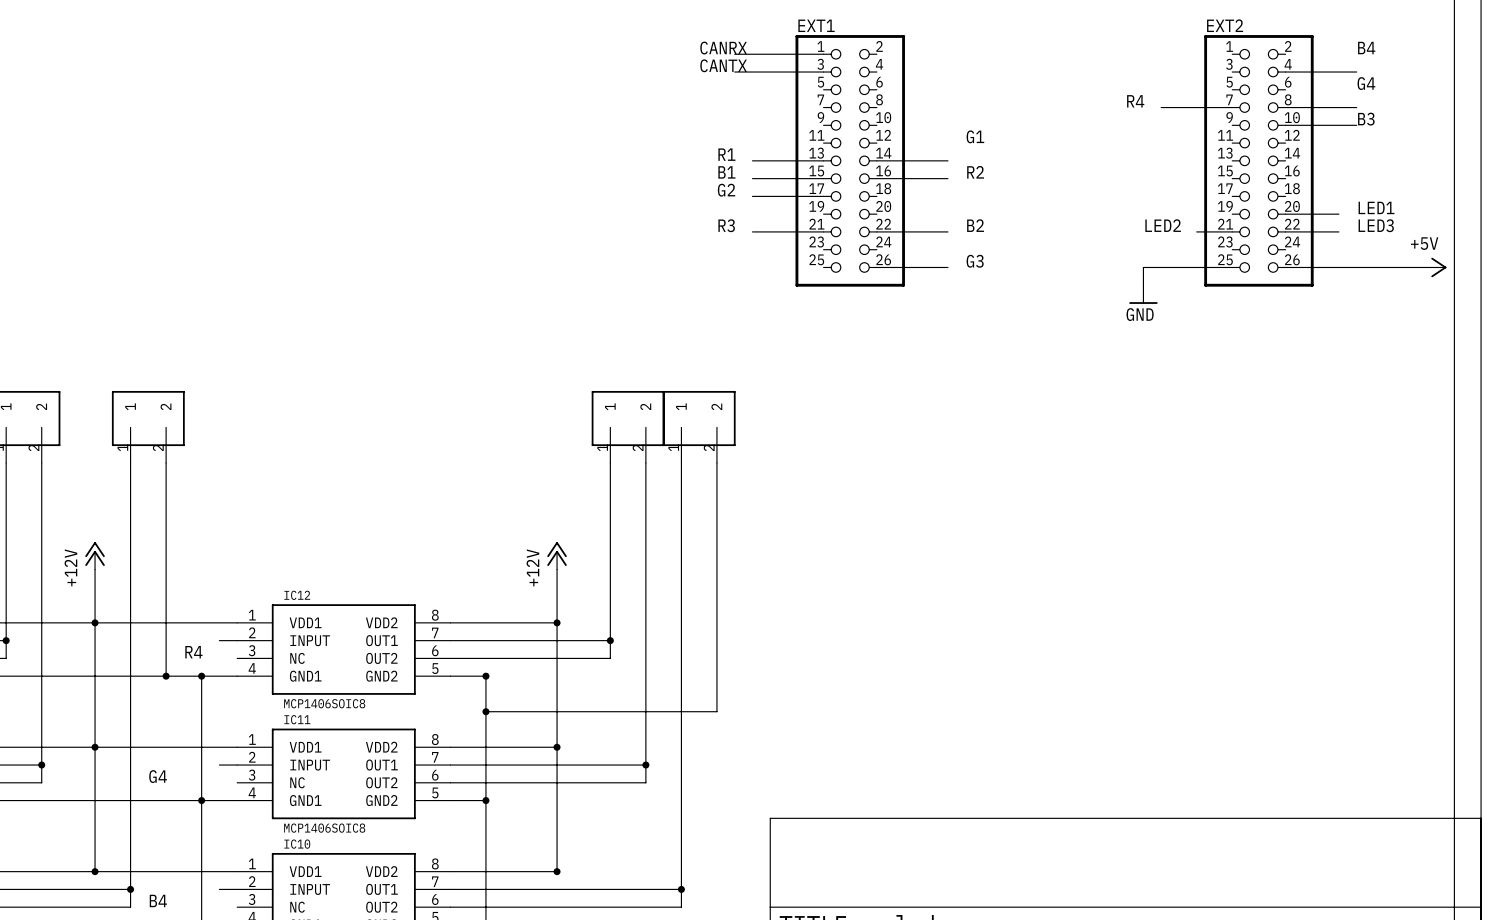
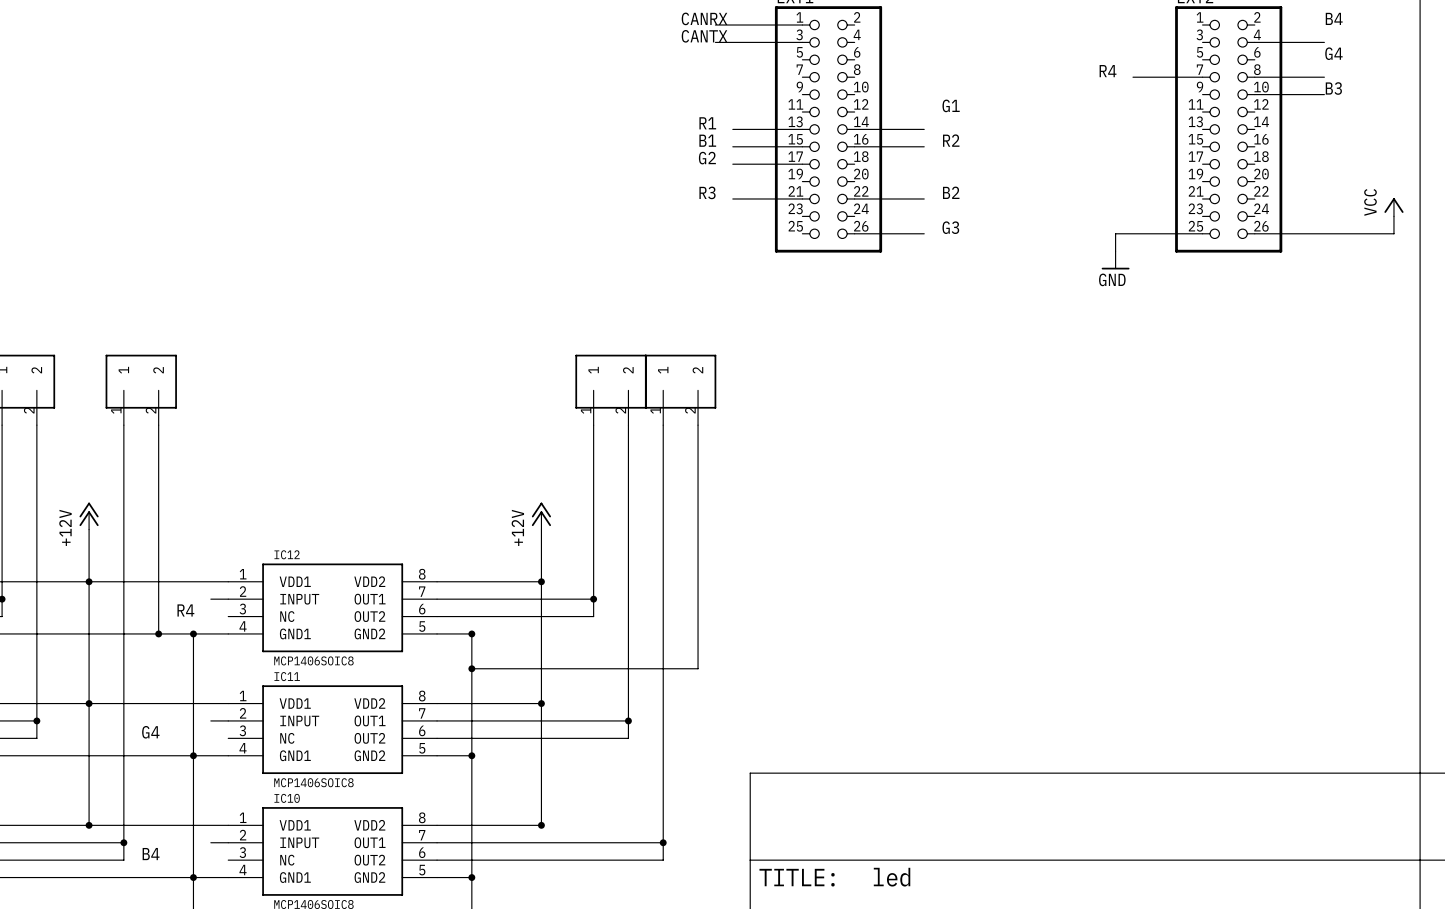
label: LED1 (1376, 207) -> none
wire: (1285, 214) (1338, 214) -> none
label: LED2 (1163, 225) -> none
label: LED3 (1376, 225) -> none
wire: (1196, 231) (1232, 231) -> none
wire: (1285, 231) (1338, 231) -> none
power symbol: none -> VCC (1393, 207)
wire: none -> (1393, 216) (1393, 233)
power symbol: +5V (1437, 267) -> none

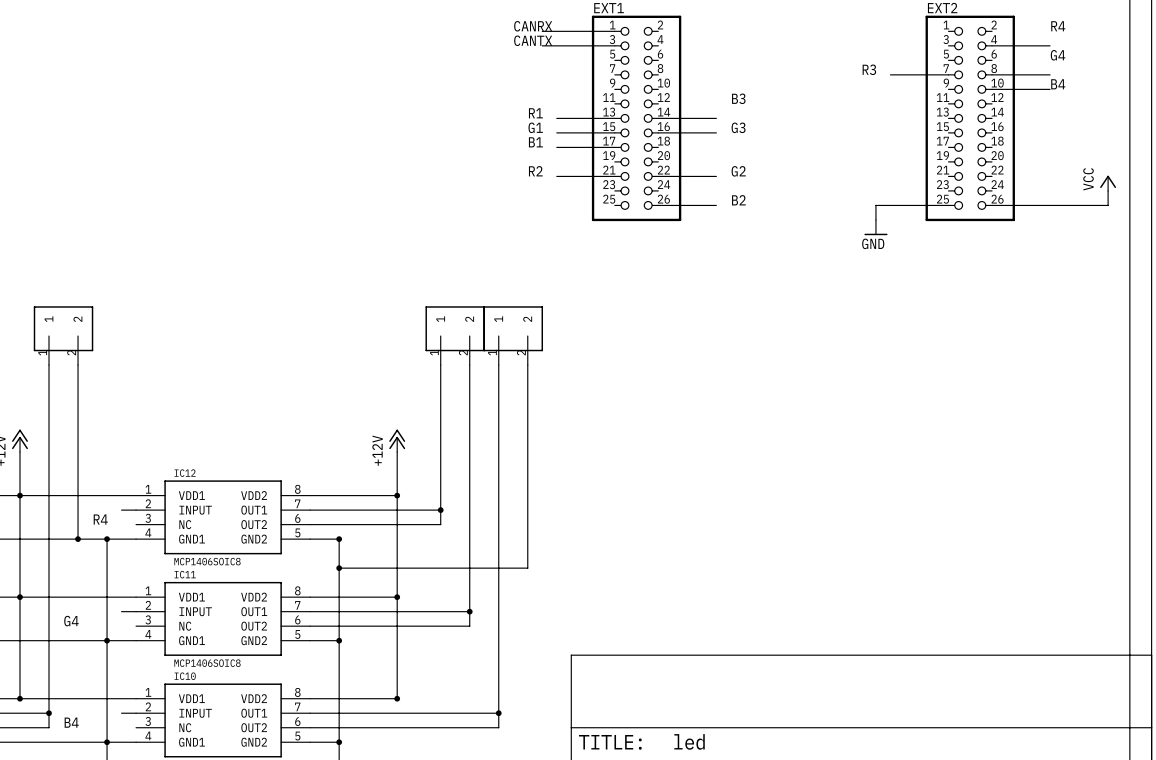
label: B4 (1334, 18) -> R4 (1058, 26)
label: R4 (1108, 71) -> R3 (869, 69)
label: B3 (1333, 88) -> B4 (1058, 84)
label: G1 (951, 105) -> B3 (738, 98)
label: B1 (707, 140) -> G1 (535, 127)
label: R2 (951, 140) -> G3 (738, 127)
label: G2 (707, 158) -> B1 (535, 142)
label: R3 (707, 192) -> R2 (535, 171)
label: B2 (951, 192) -> G2 (738, 171)
label: G3 (950, 227) -> B2 (738, 200)

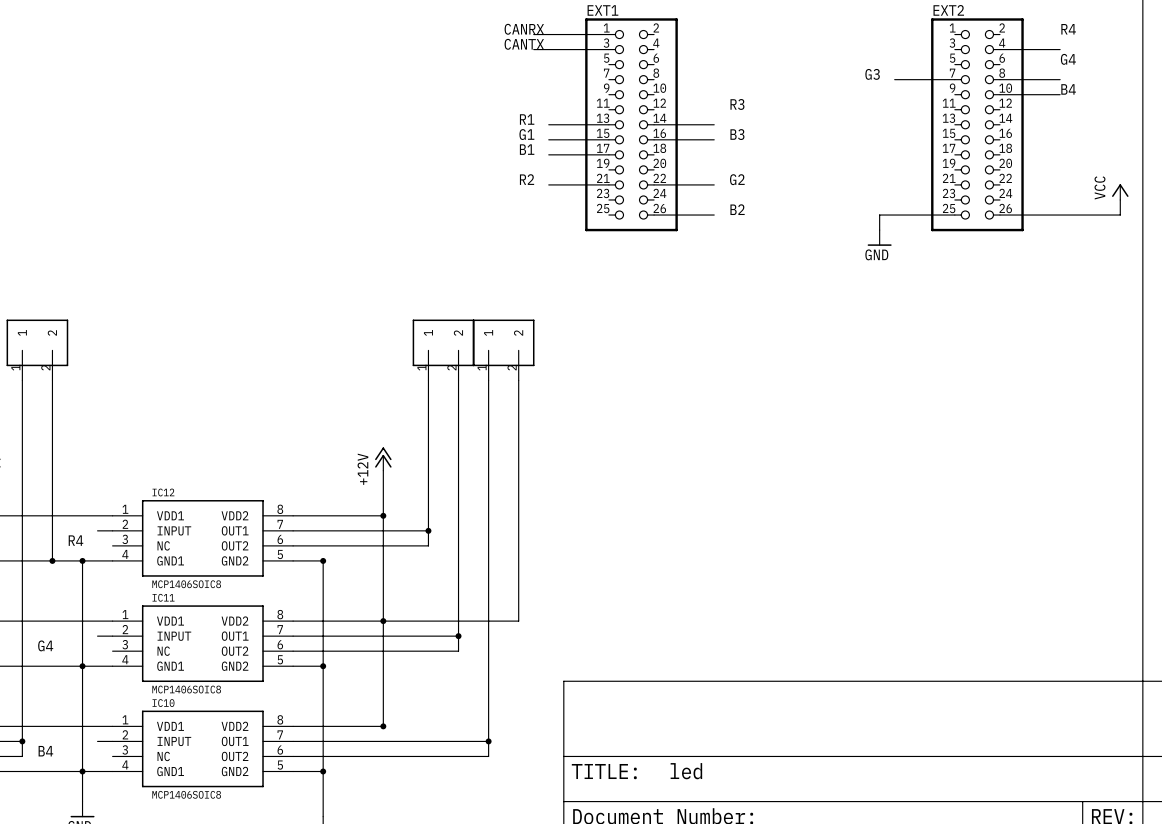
label: R3 (869, 69) -> G3 (872, 74)
label: B3 (738, 98) -> R3 (737, 104)
label: G3 (738, 127) -> B3 (737, 134)
wire: (339, 568) (527, 568) -> (383, 621) (518, 621) (518, 591)
junction: (339, 568) -> none

